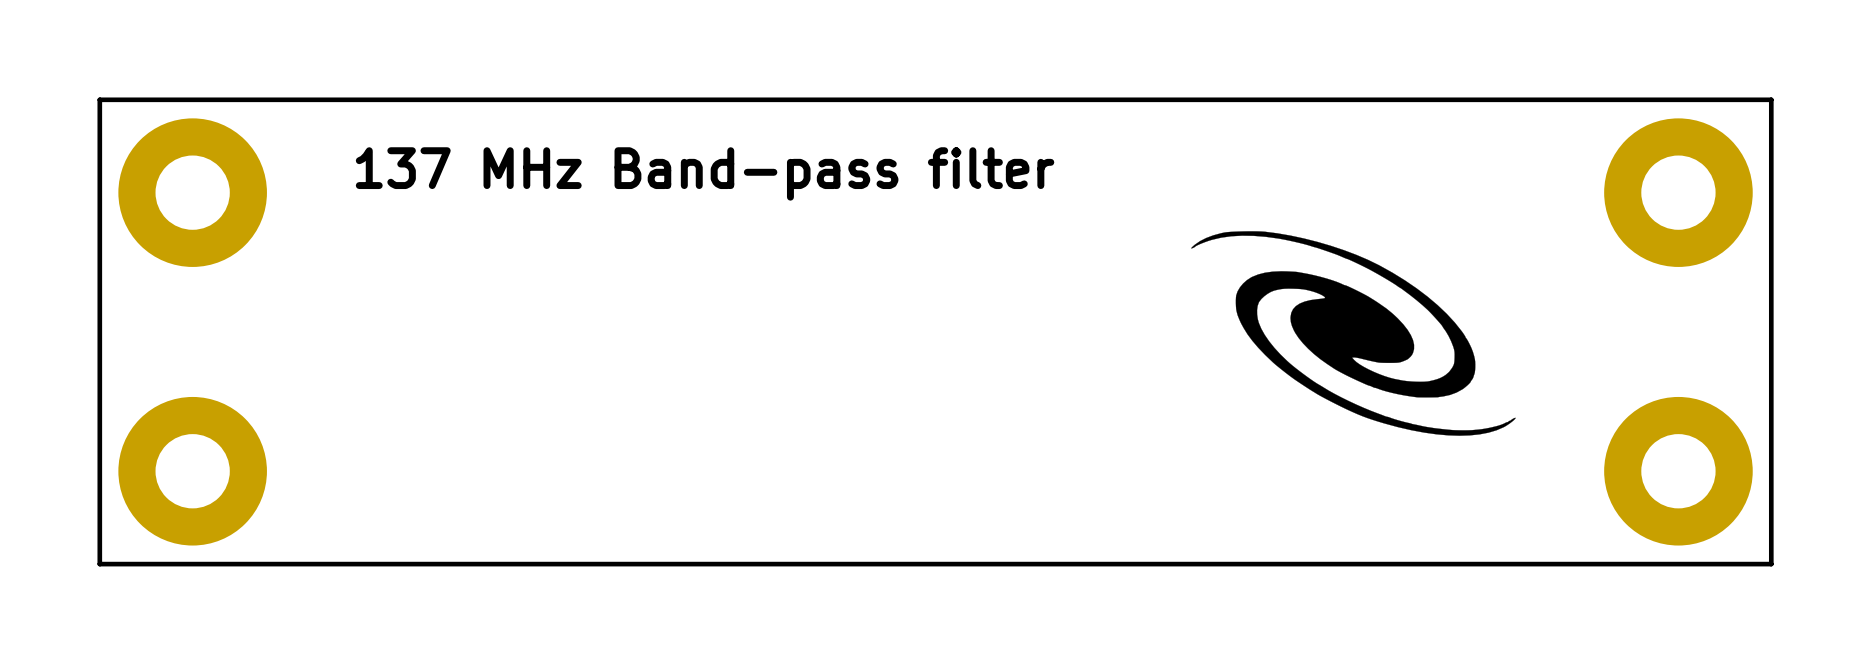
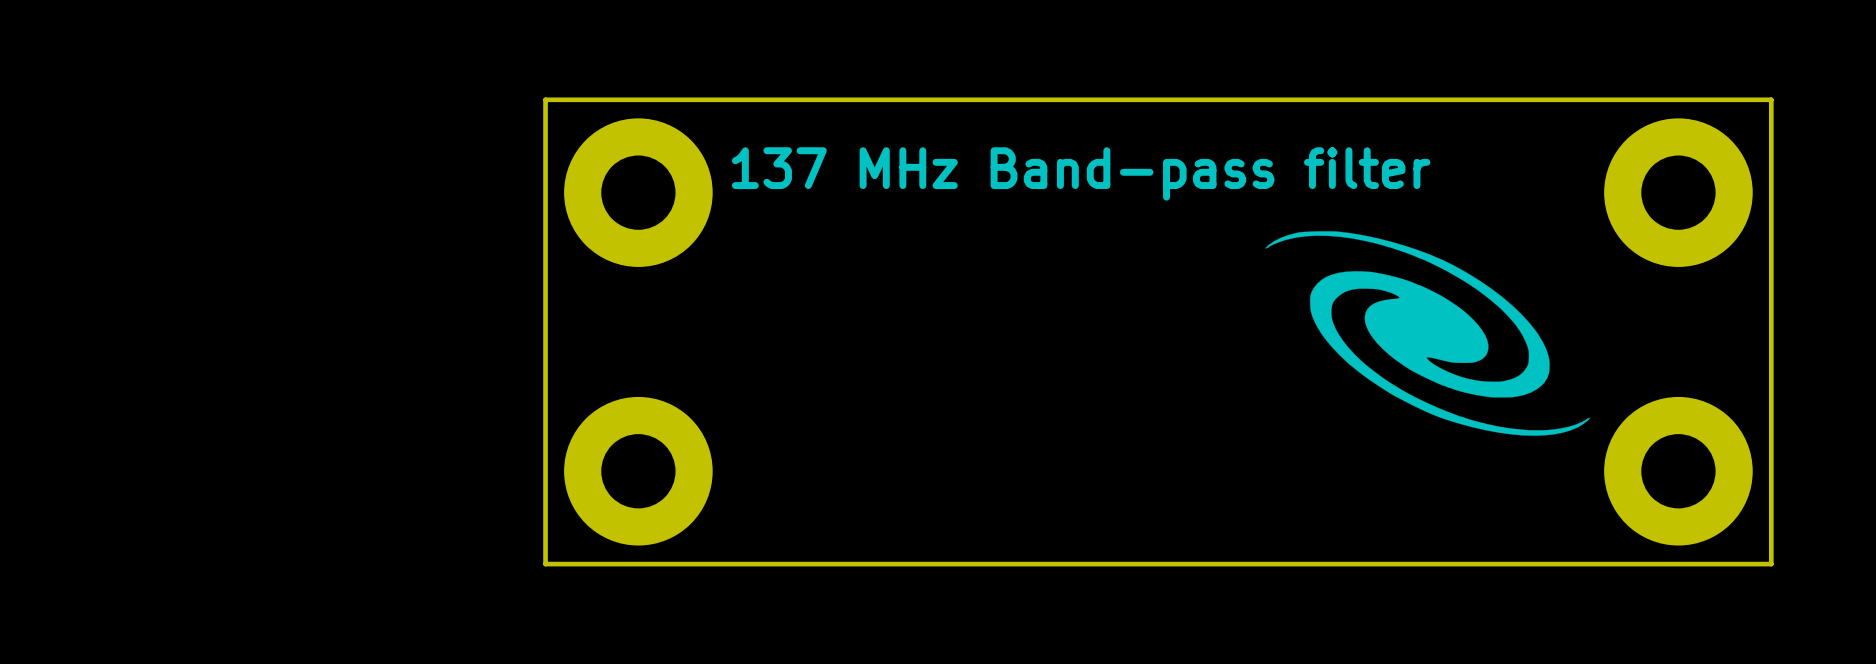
board edge: (545, 99) (99, 99) (99, 564) (545, 564) -> (545, 99) (545, 564)
text position: 137 MHz Band-pass filter (705, 173) -> 137 MHz Band-pass filter (1081, 173)
part: (192, 192) -> none
part: none -> (638, 192)
drawing position: (1353, 333) -> (1427, 333)
part: (192, 471) -> none
part: none -> (638, 471)

